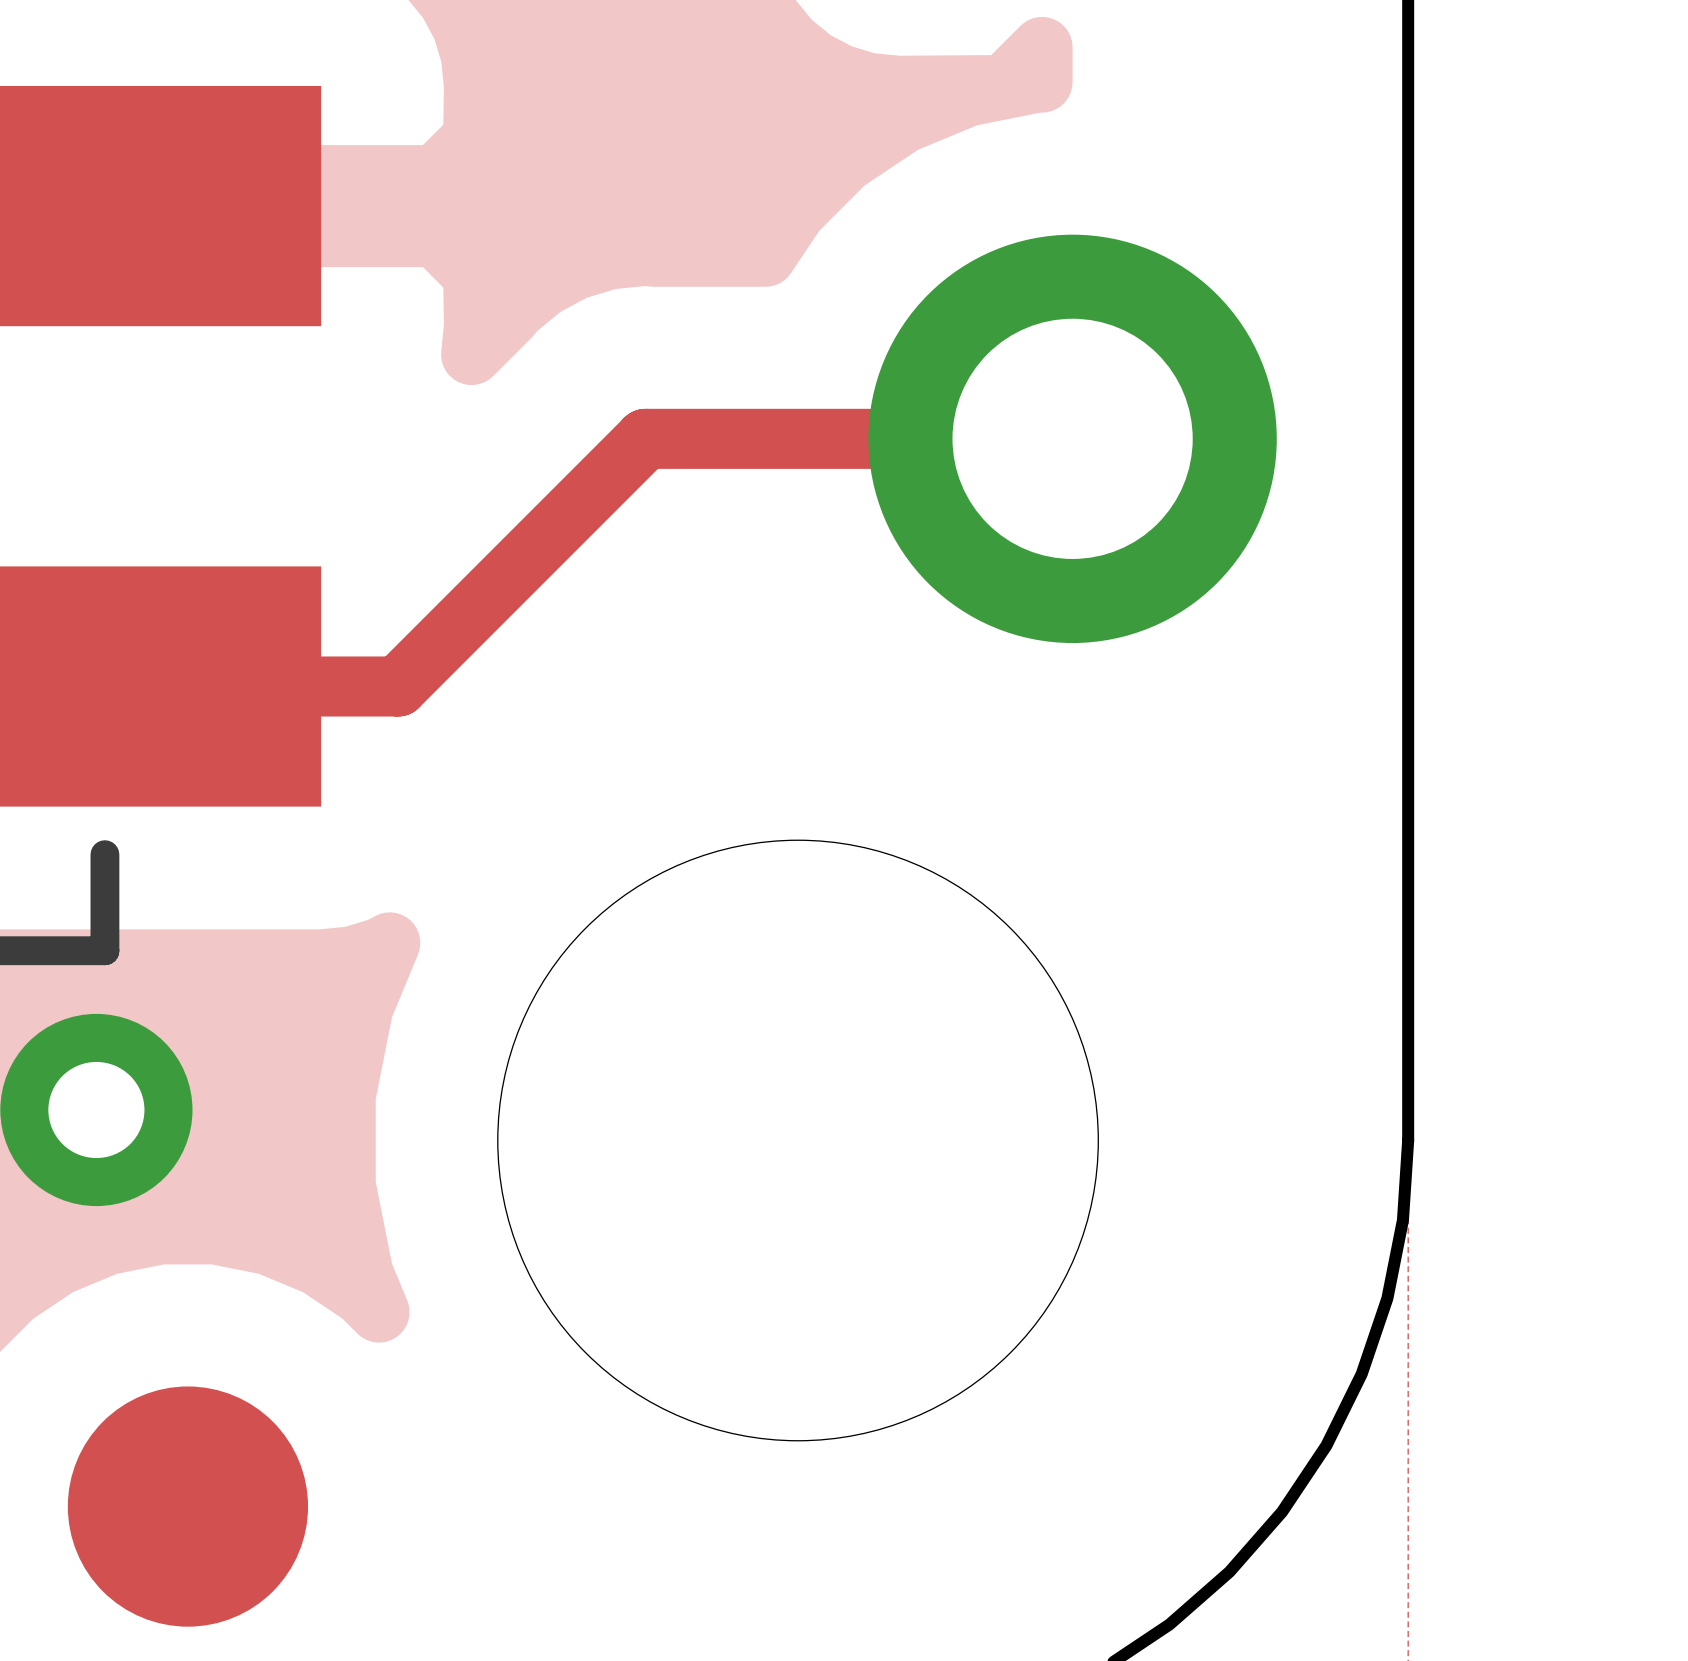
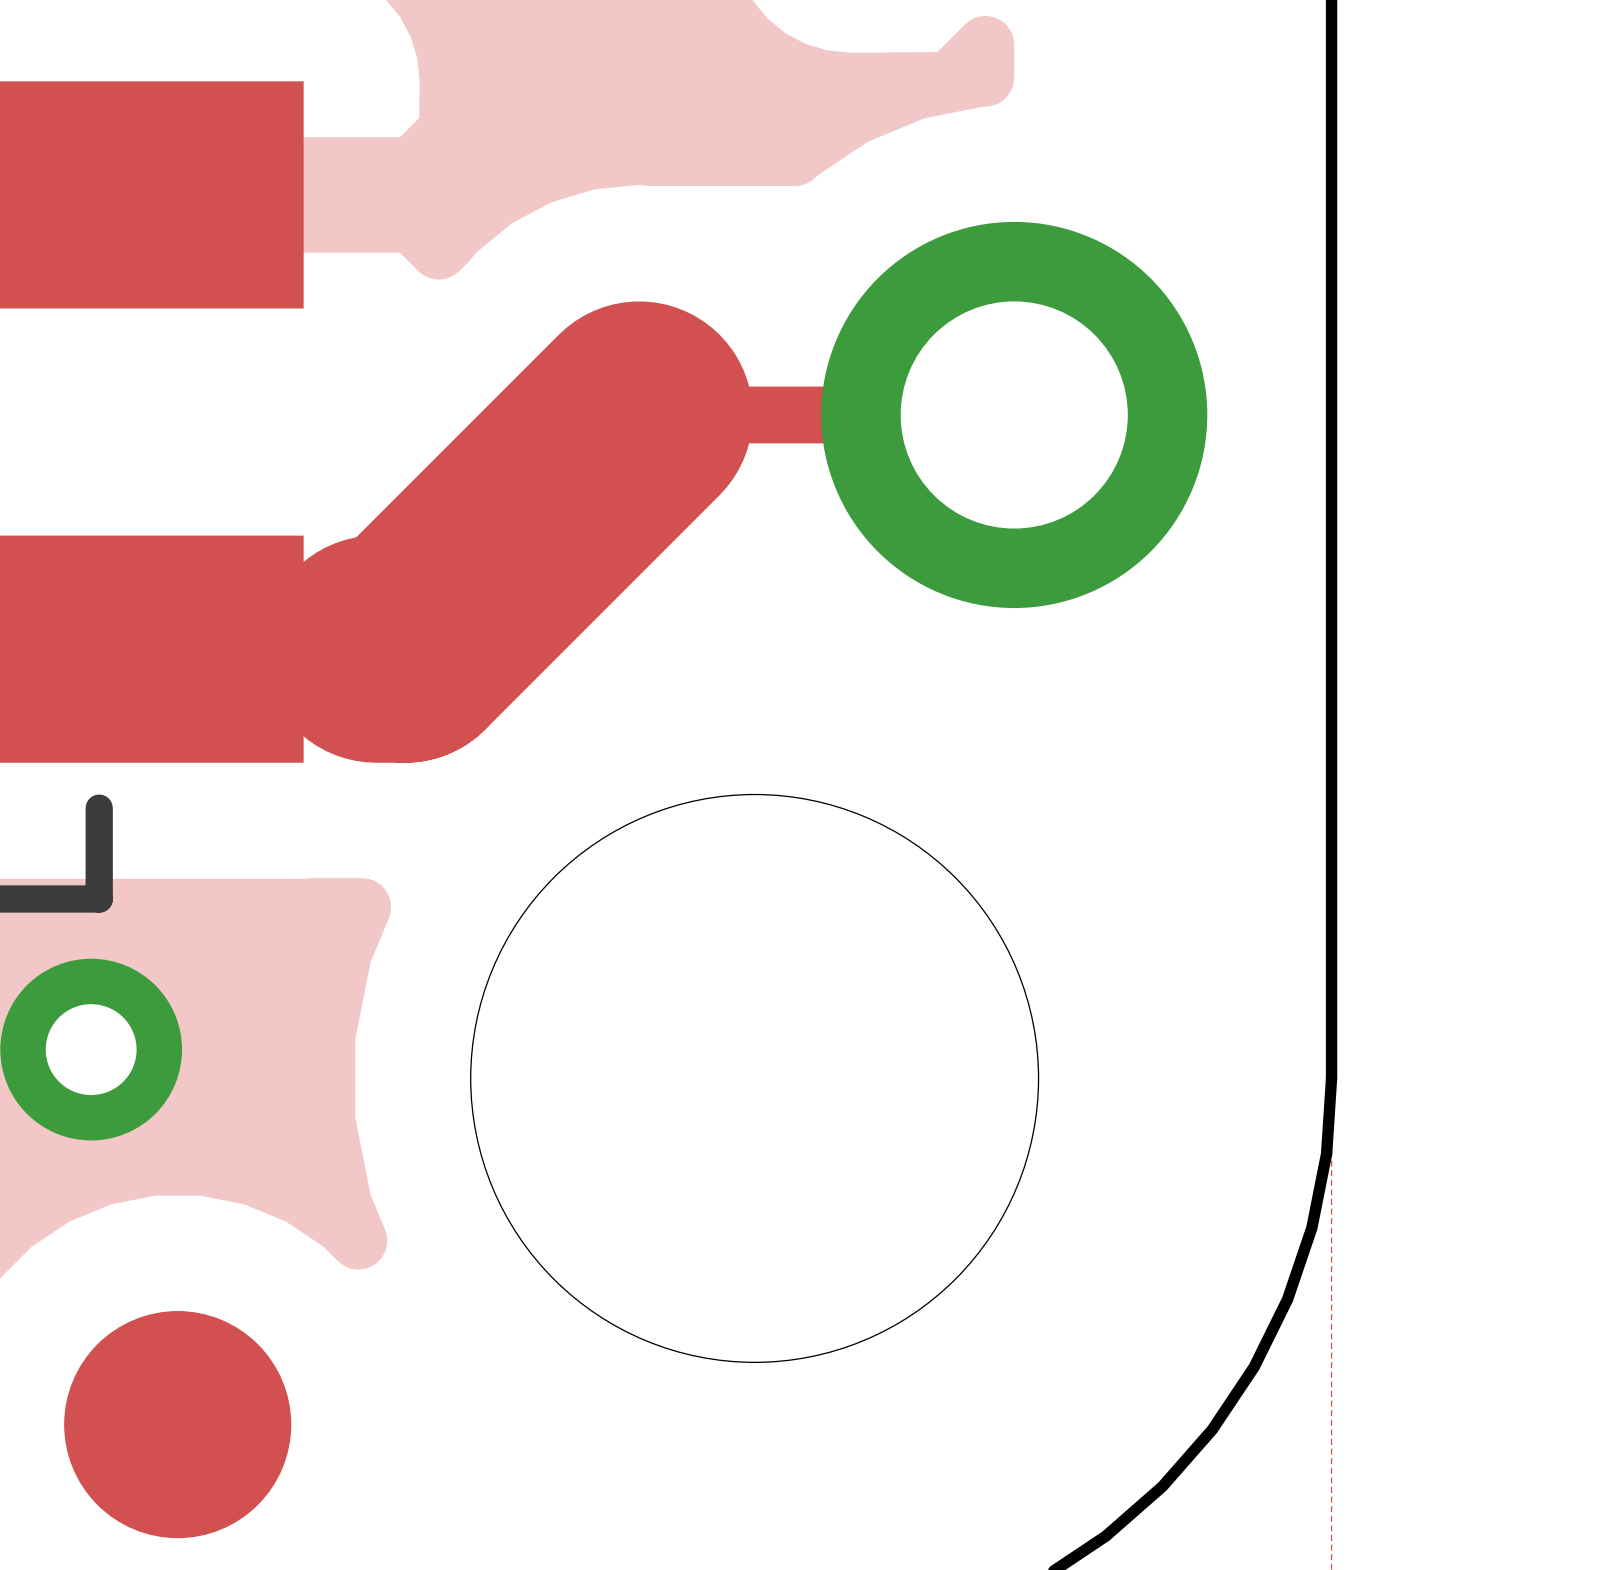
track: (676, 438) (645, 438) (397, 686) -> (639, 414) (405, 649) (376, 649)

